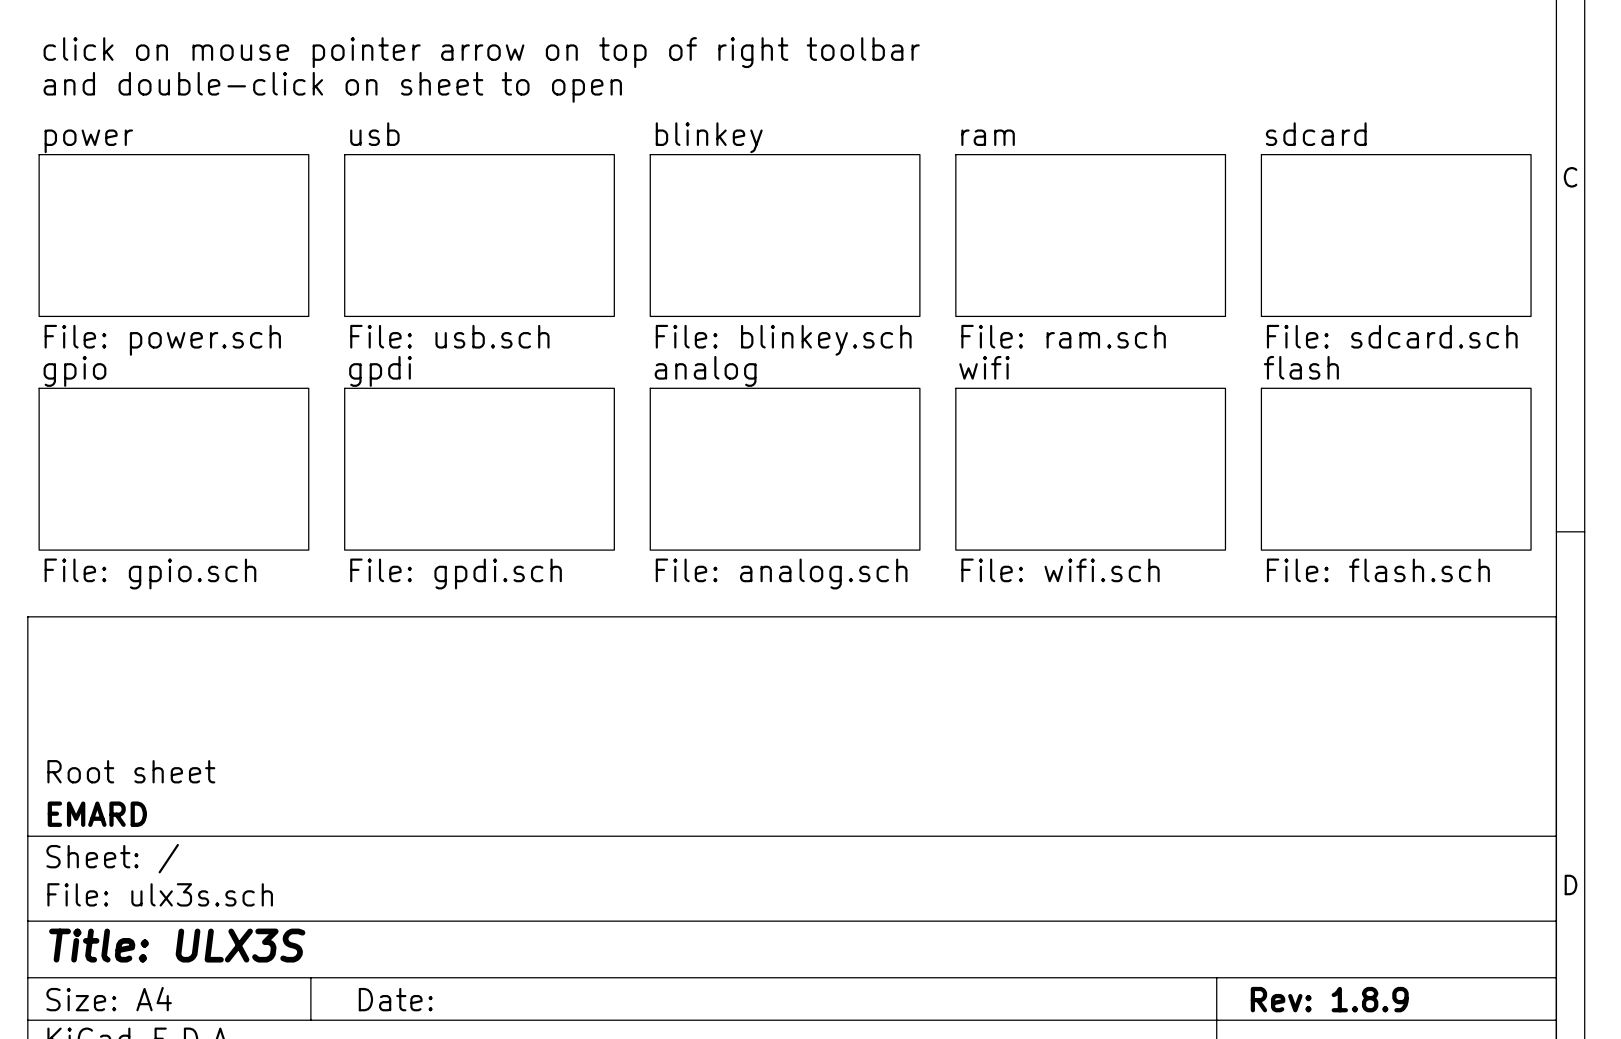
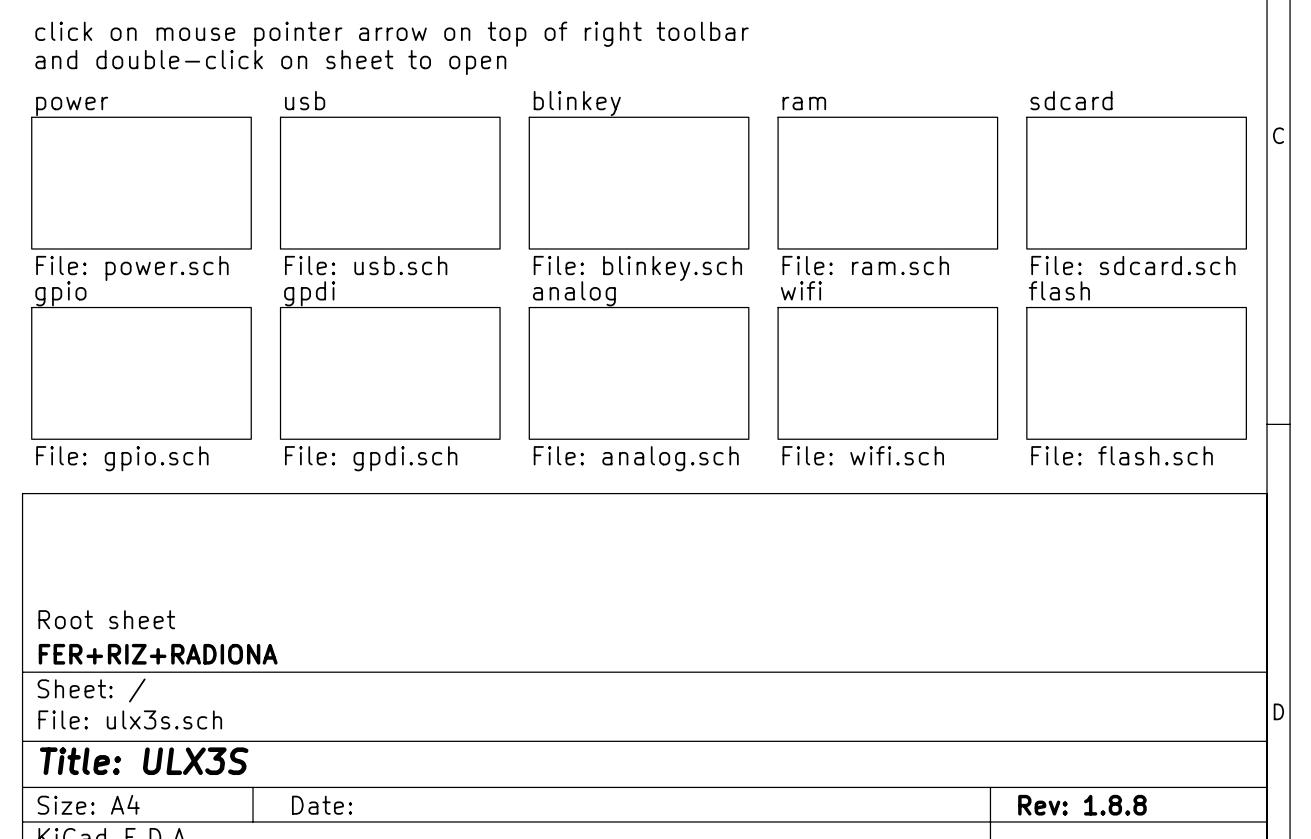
title block: EMARD (97, 814) -> FER+RIZ+RADIONA (158, 654)
title block: Rev: 1.8.9 (1329, 999) -> Rev: 1.8.8 (1082, 805)

